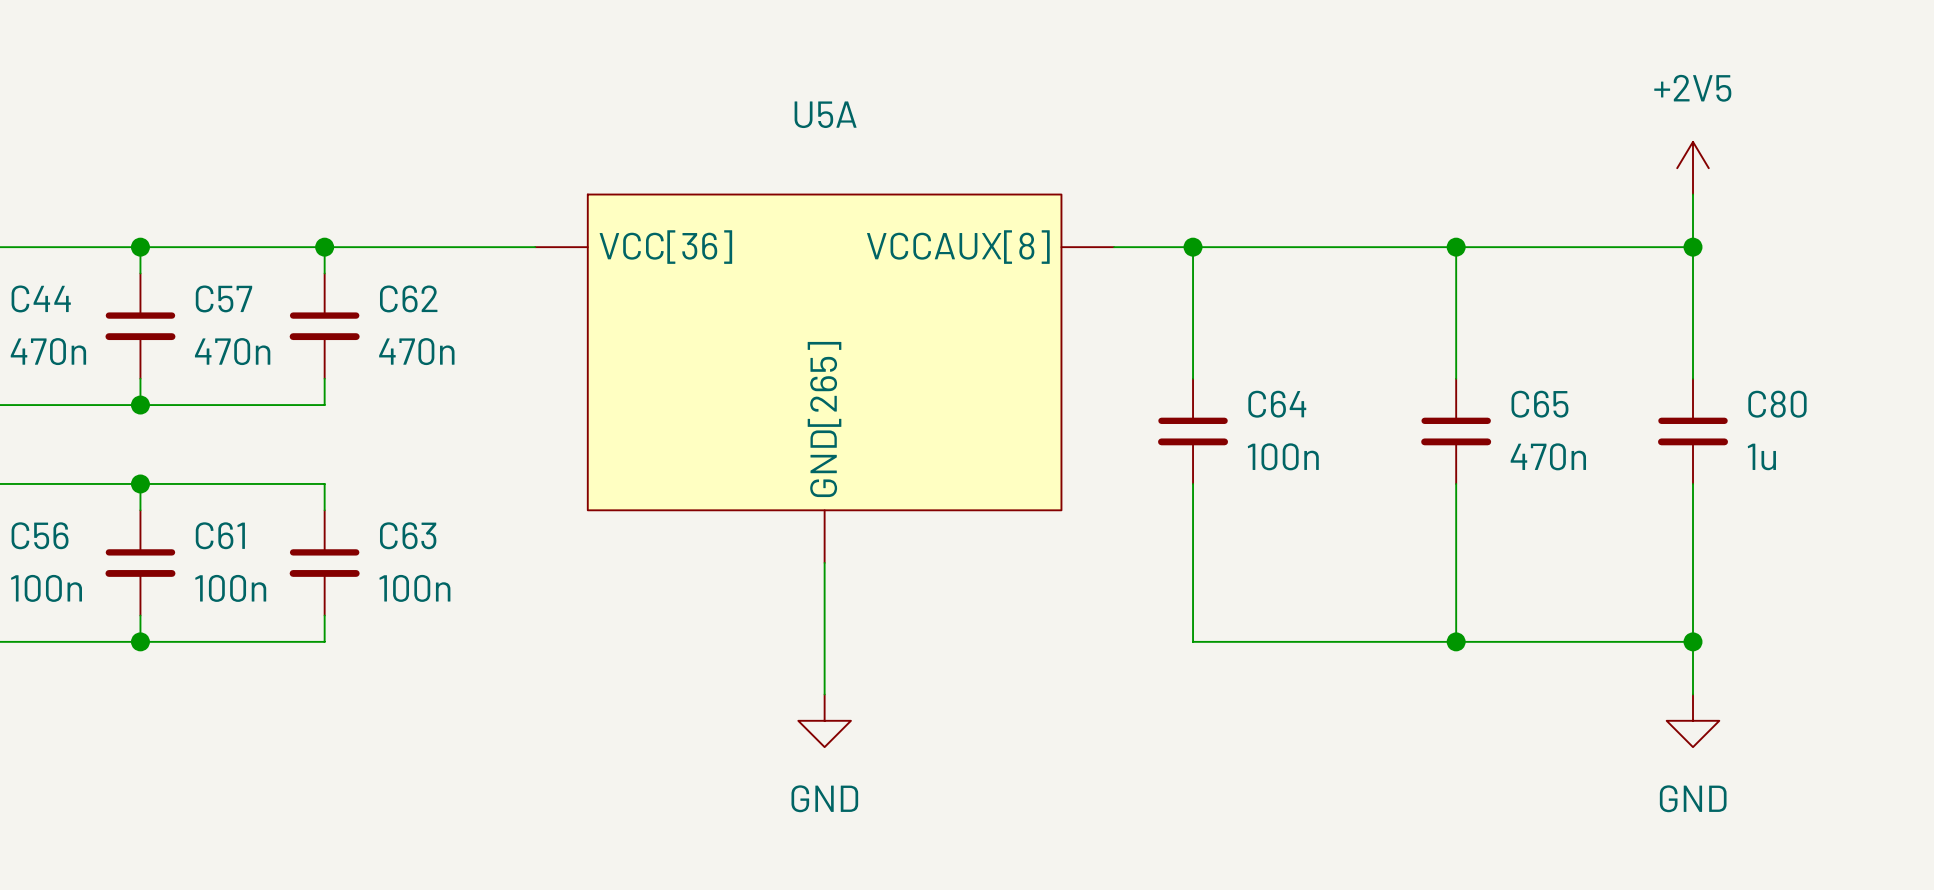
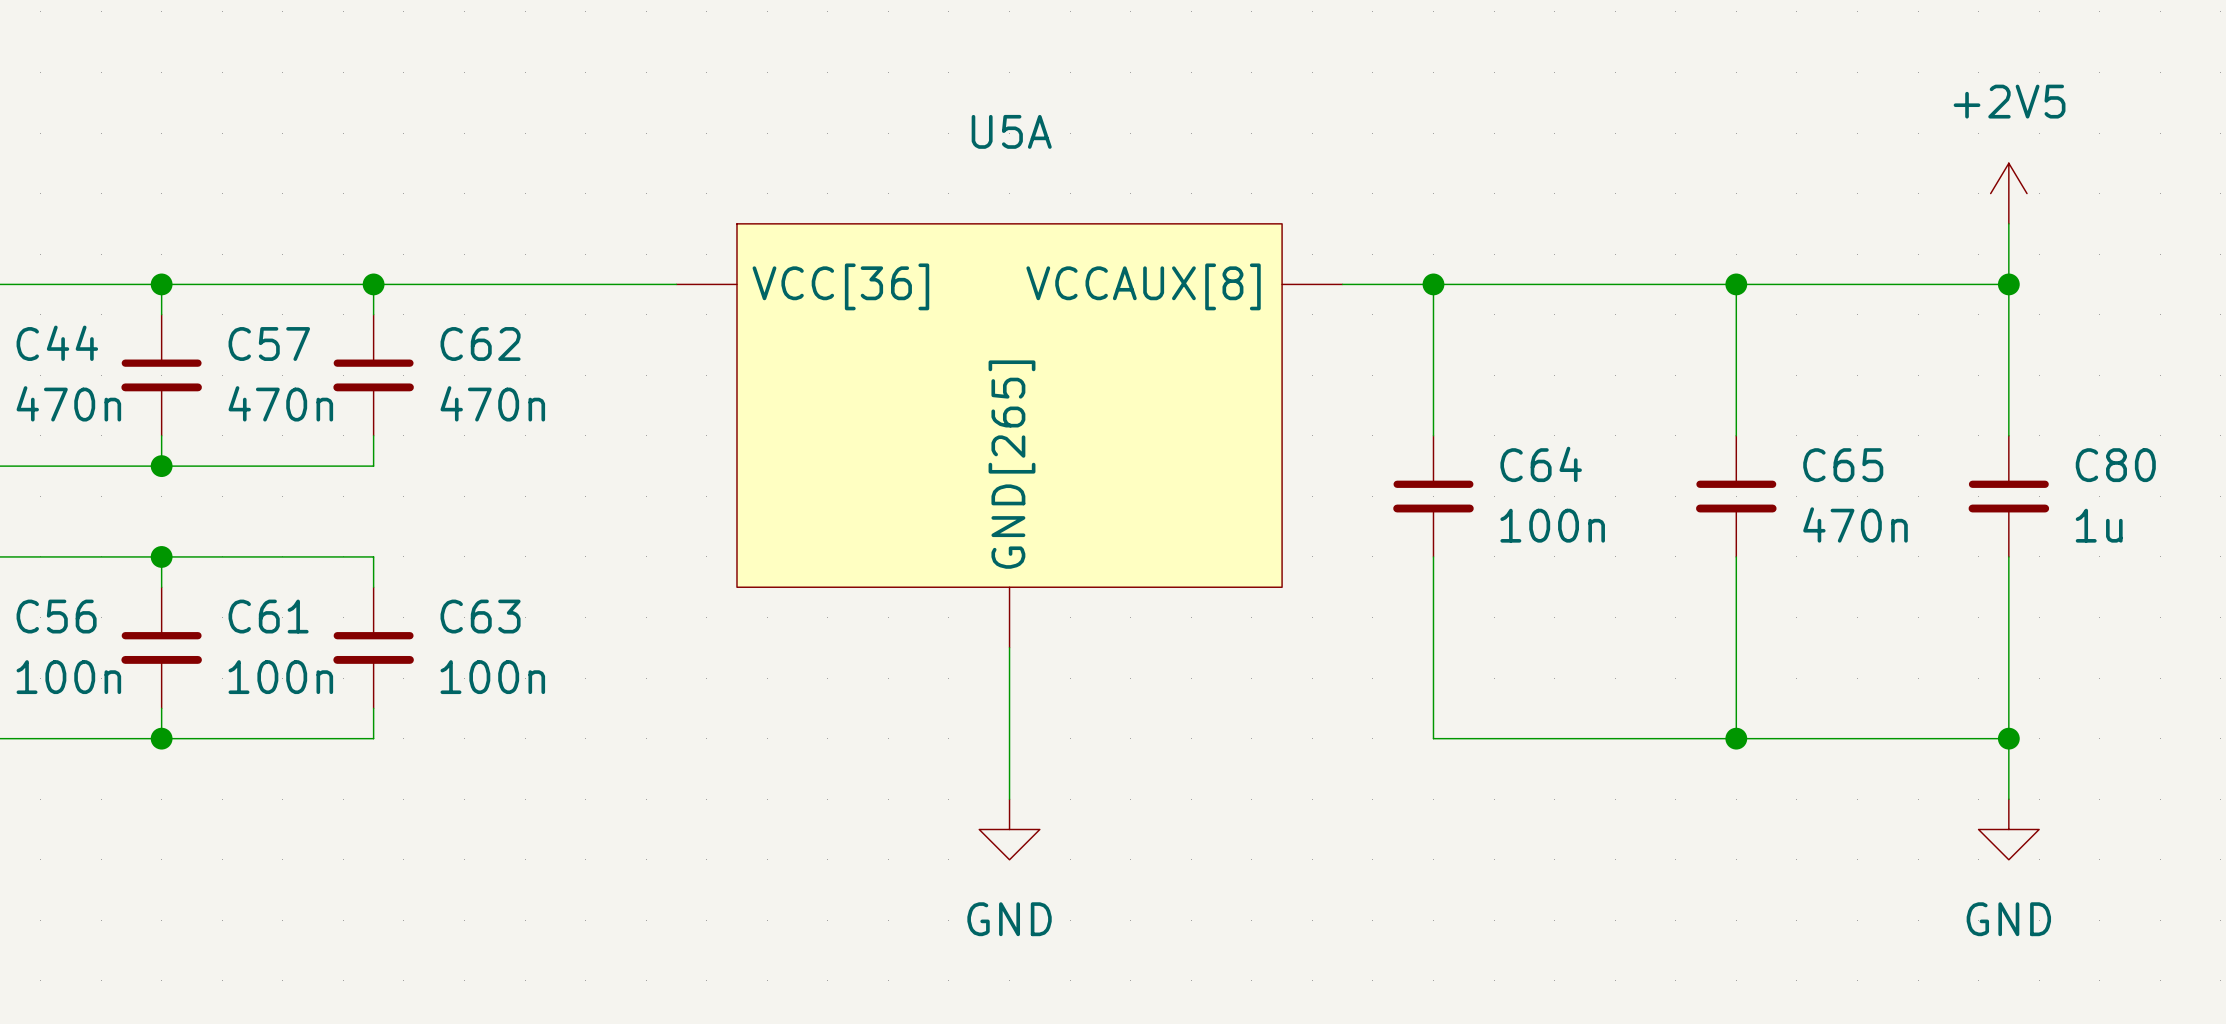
power symbol position: +2V5 (1693, 168) -> +2V5 (2008, 193)
wire: (1693, 194) (1693, 378) -> (2008, 223) (2008, 435)
wire: (1193, 247) (1193, 378) -> (1433, 284) (1433, 435)
junction position: (1193, 247) -> (1433, 284)
wire: (1456, 247) (1456, 378) -> (1736, 284) (1736, 435)
junction position: (1456, 247) -> (1736, 284)
wire: none -> (1948, 284) (2008, 284)
junction position: (1693, 247) -> (2008, 284)
U5A position: (824, 378) -> (1009, 435)
C64 position: (1193, 431) -> (1433, 496)
C65 position: (1456, 431) -> (1736, 496)
C80 position: (1693, 431) -> (2008, 496)
wire: (1193, 483) (1193, 641) (1245, 641) -> (1433, 556) (1433, 738)
wire: (1456, 483) (1456, 641) -> (1736, 556) (1736, 738)
wire: (1693, 483) (1693, 694) -> (2008, 556) (2008, 799)
wire: (824, 562) (824, 694) -> (1009, 647) (1009, 799)
junction position: (1456, 641) -> (1736, 738)
wire: none -> (1948, 738) (2008, 738)
junction position: (1693, 641) -> (2008, 738)
power symbol position: GND (824, 720) -> GND (1009, 829)
power symbol position: GND (1693, 720) -> GND (2008, 829)

